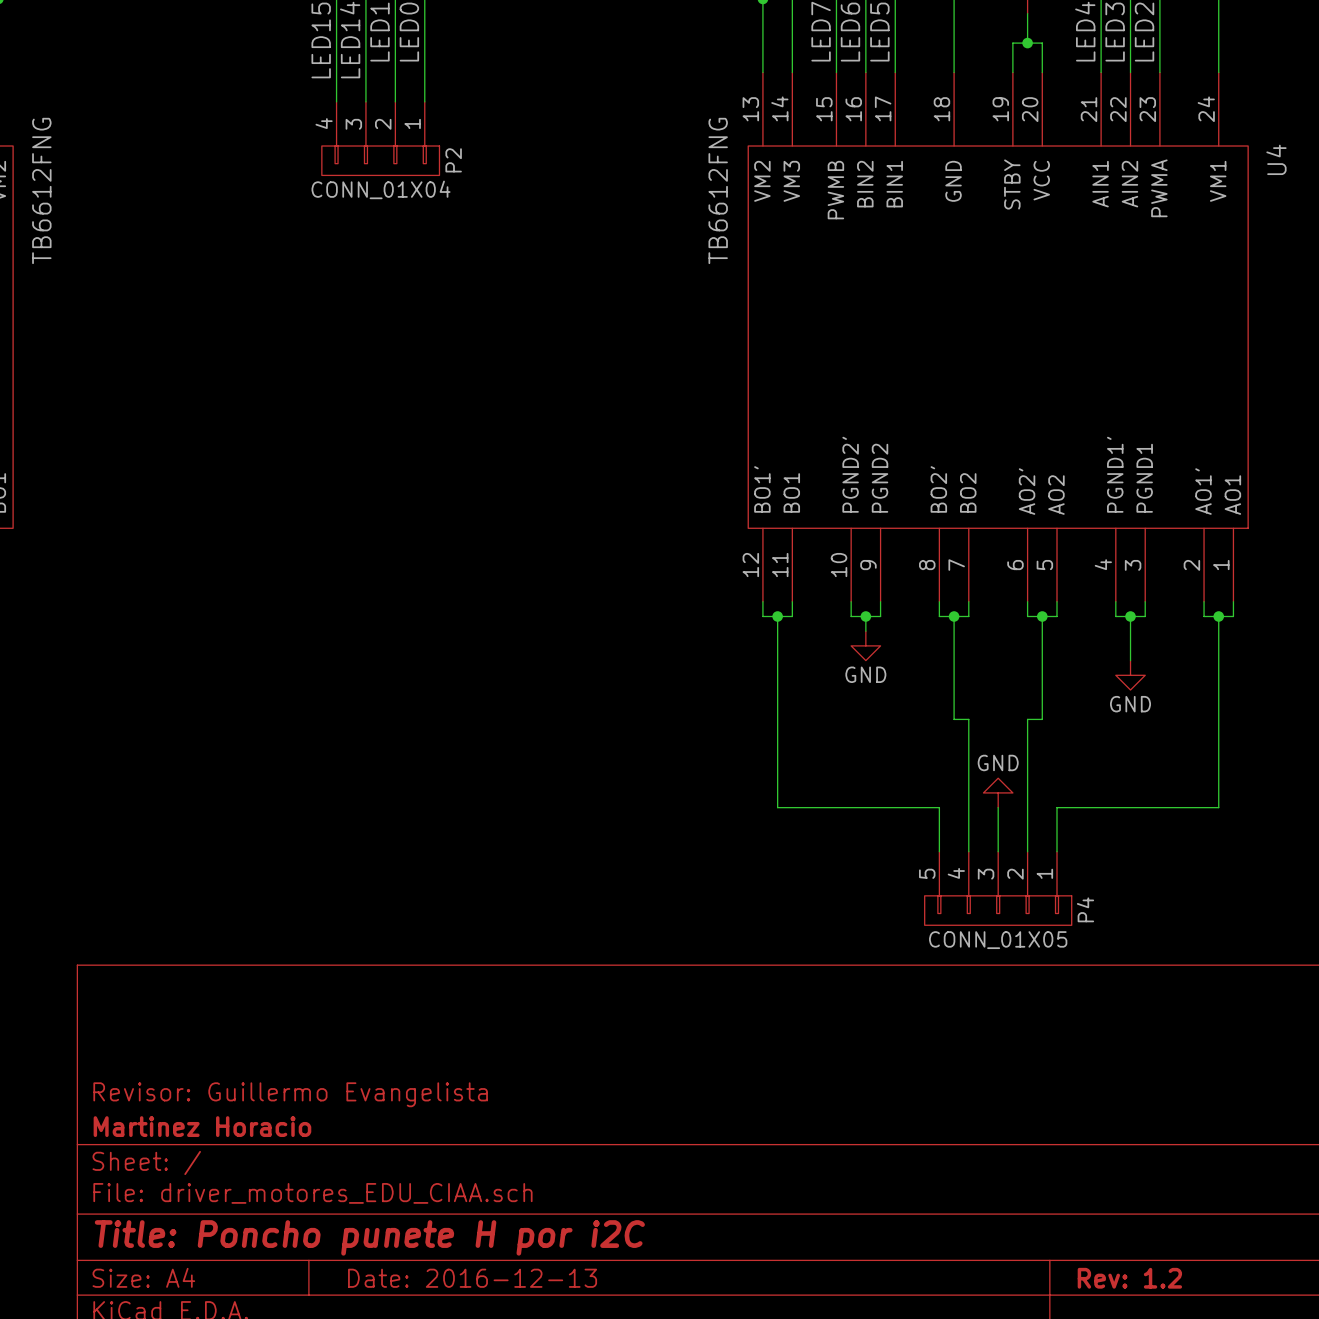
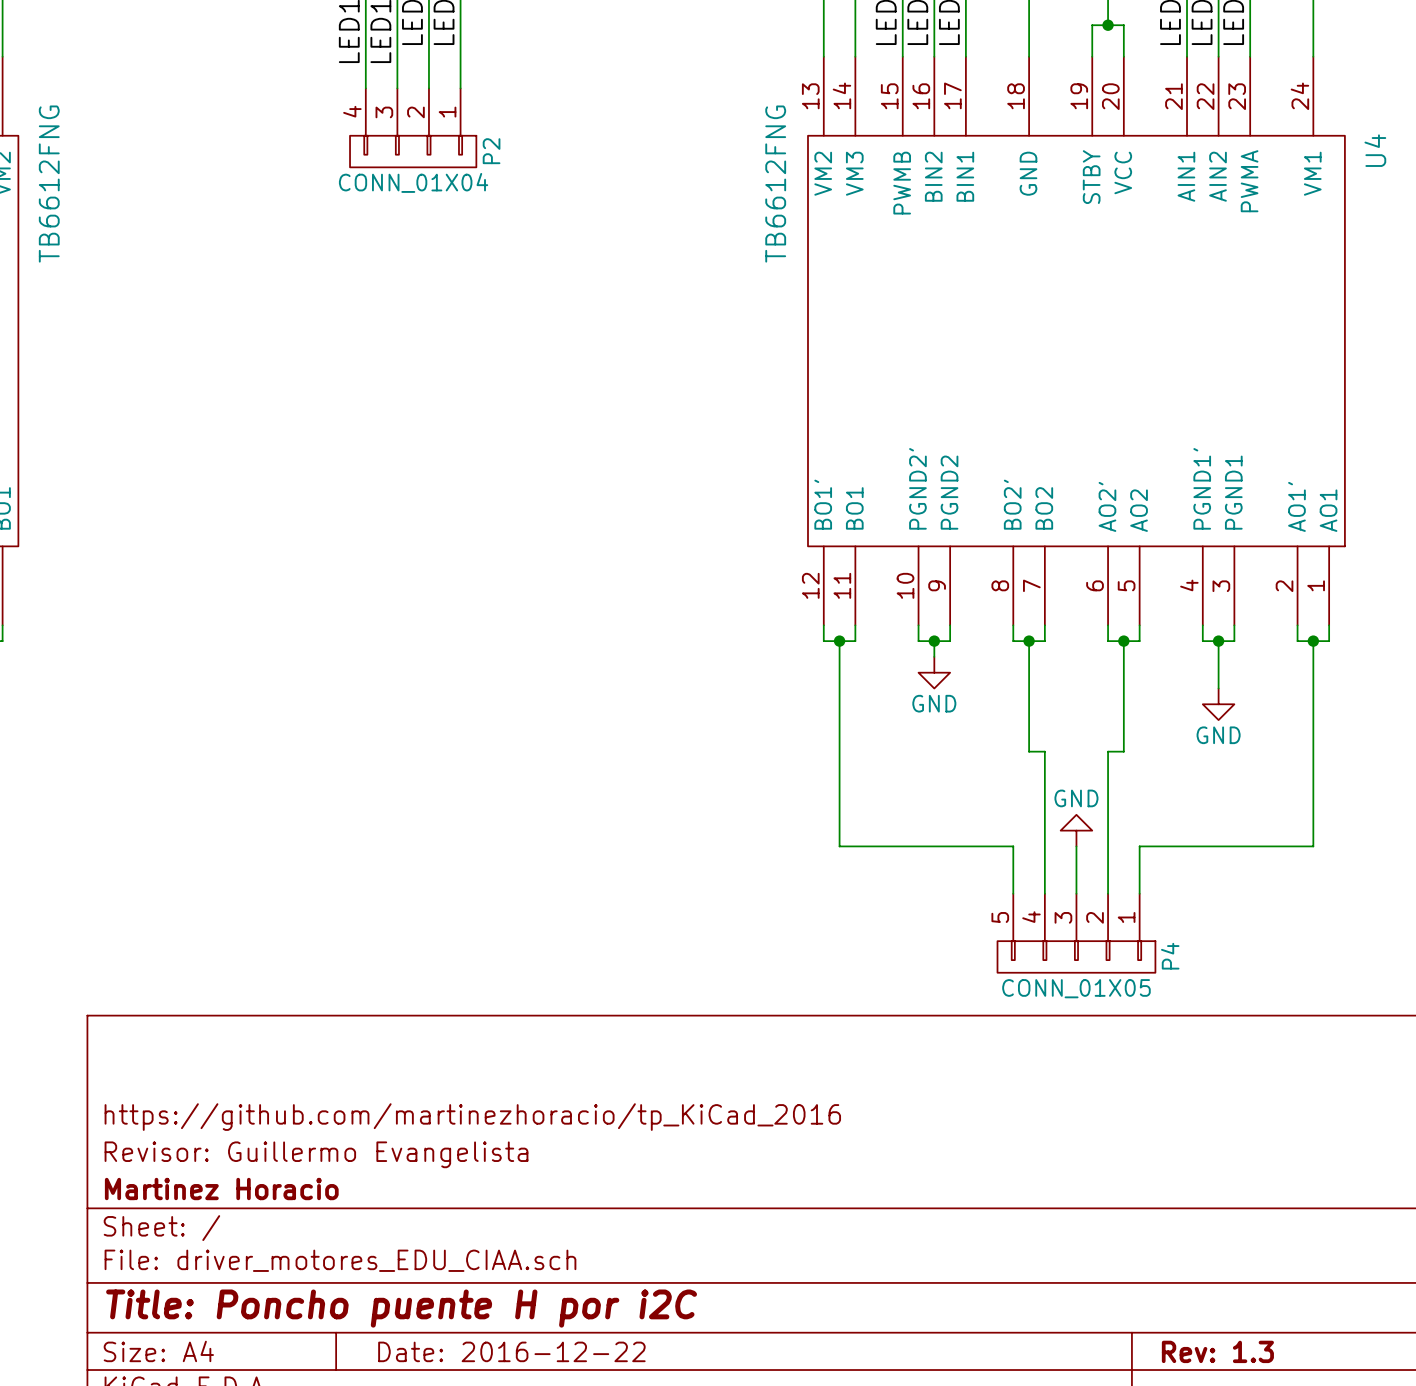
title block: none -> https://github.com/martinezhoracio/tp_KiCad_2016 (472, 1117)
title block: Title: Poncho punete H por i2C (369, 1237) -> Title: Poncho puente H por i2C (401, 1308)
title block: Date: 2016-12-13 (472, 1278) -> Date: 2016-12-22 (511, 1351)
title block: Rev: 1.2 (1129, 1278) -> Rev: 1.3 (1217, 1351)

